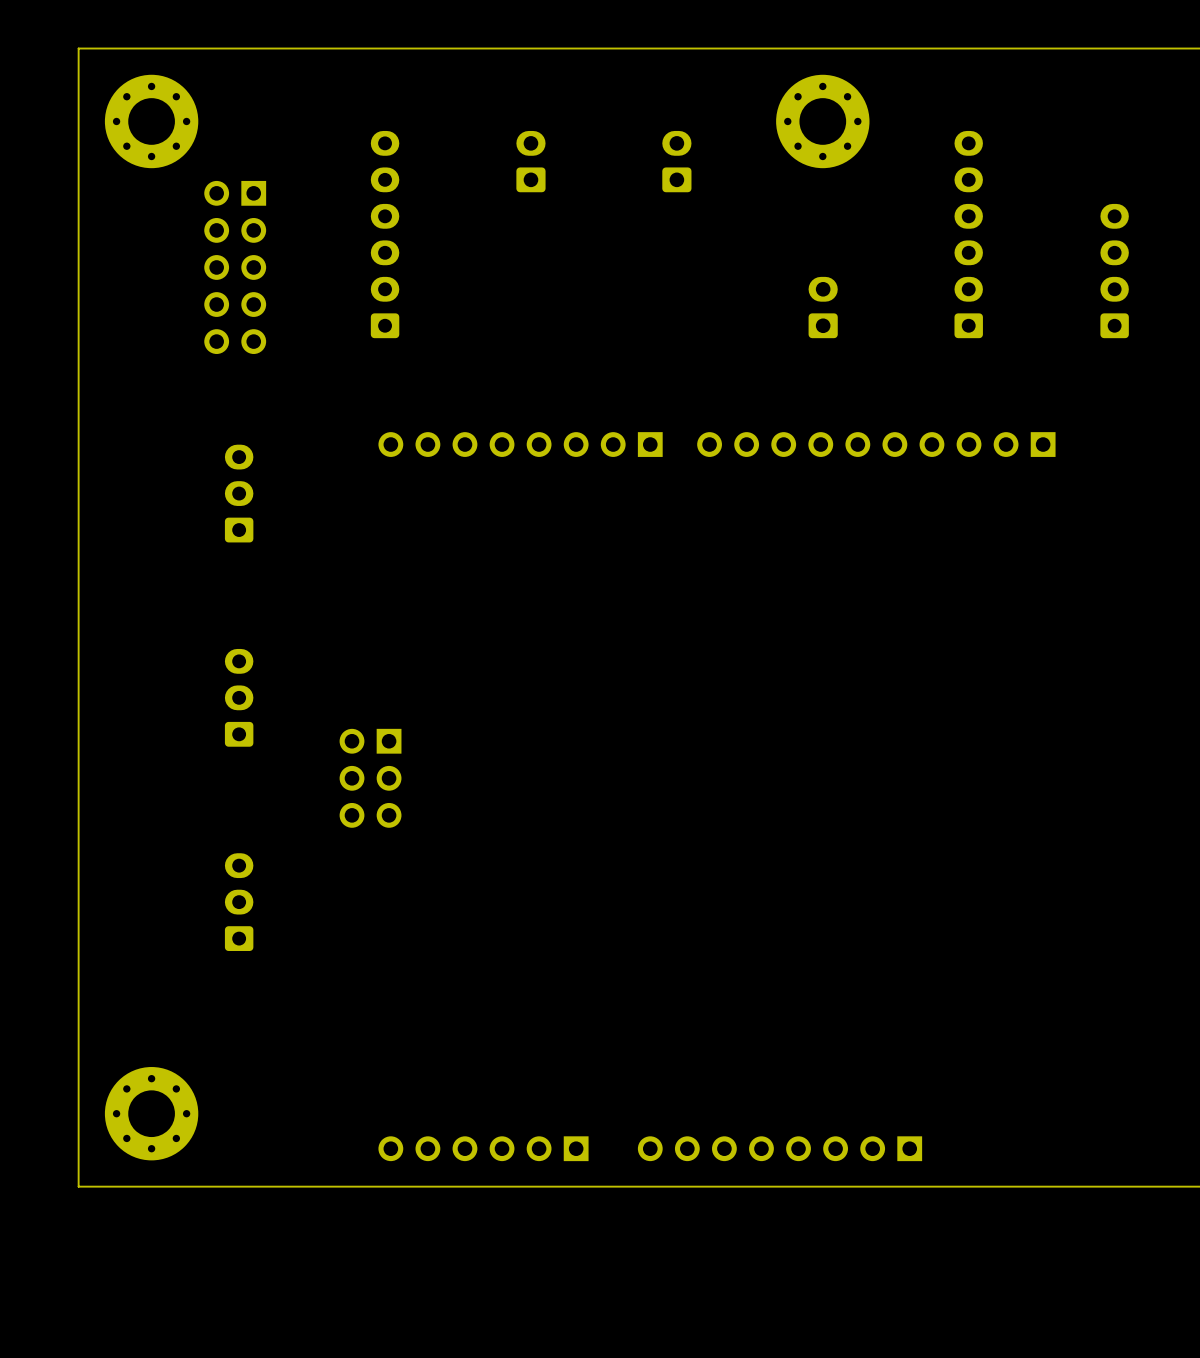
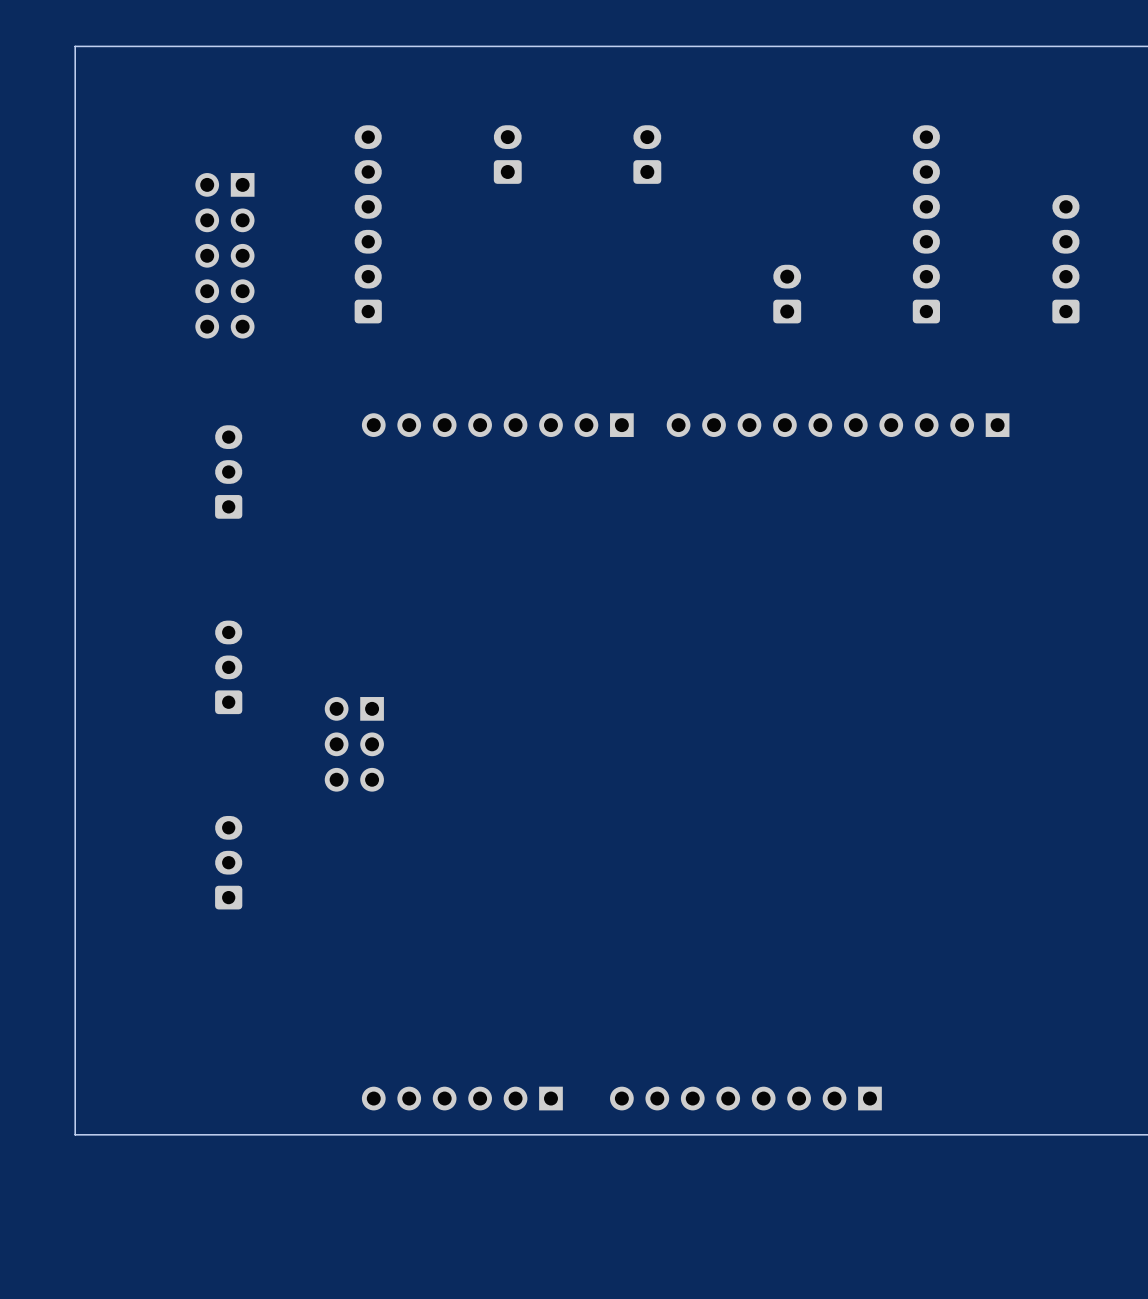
part: (151, 121) -> none
part: (822, 121) -> none
part: (151, 1113) -> none

